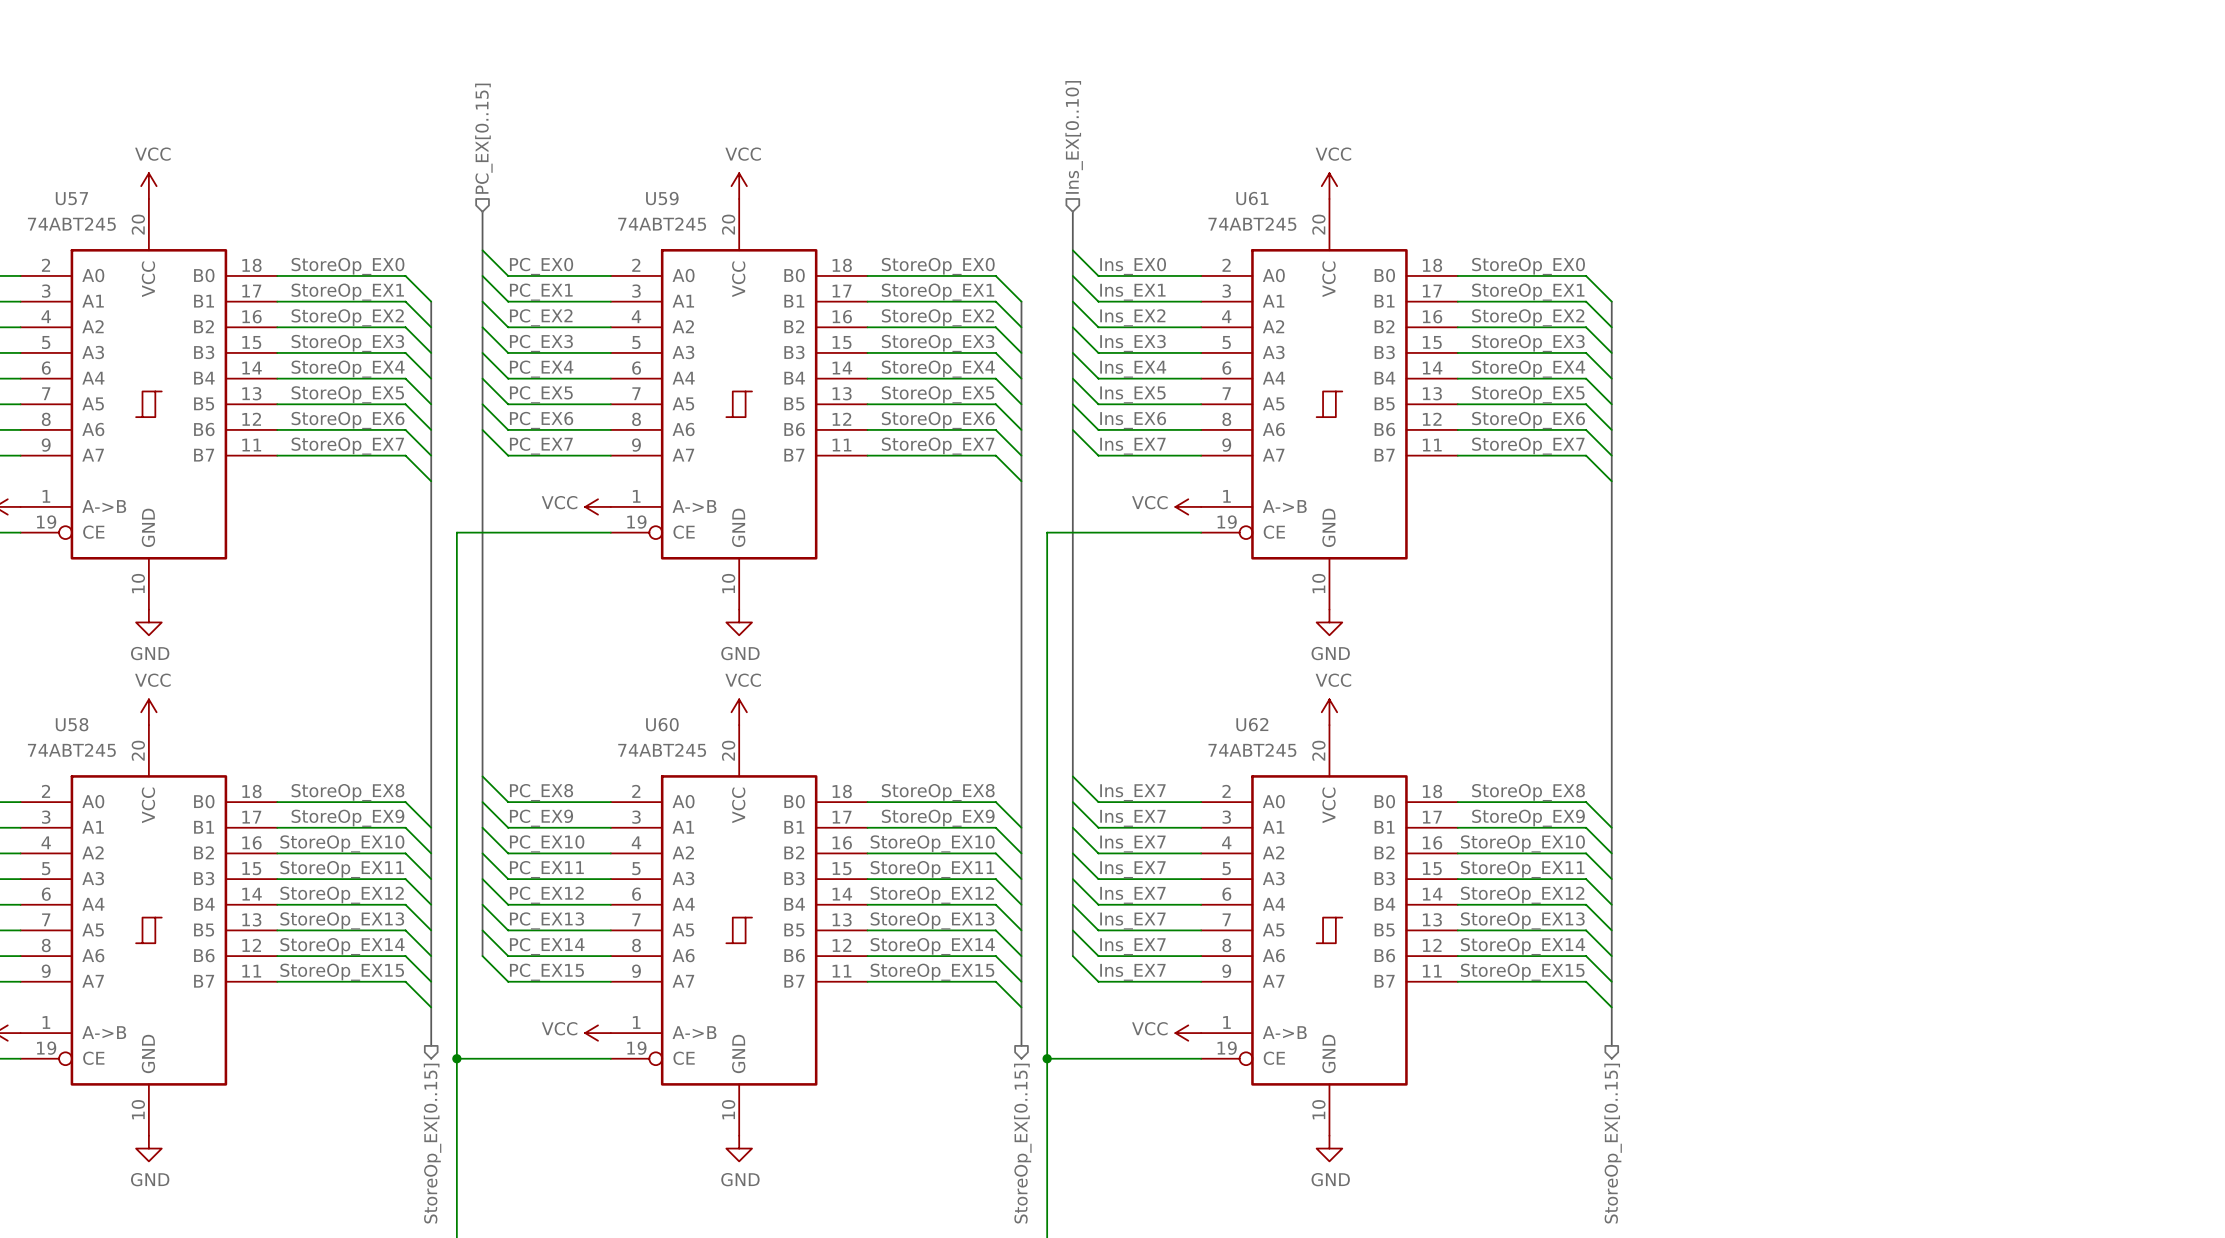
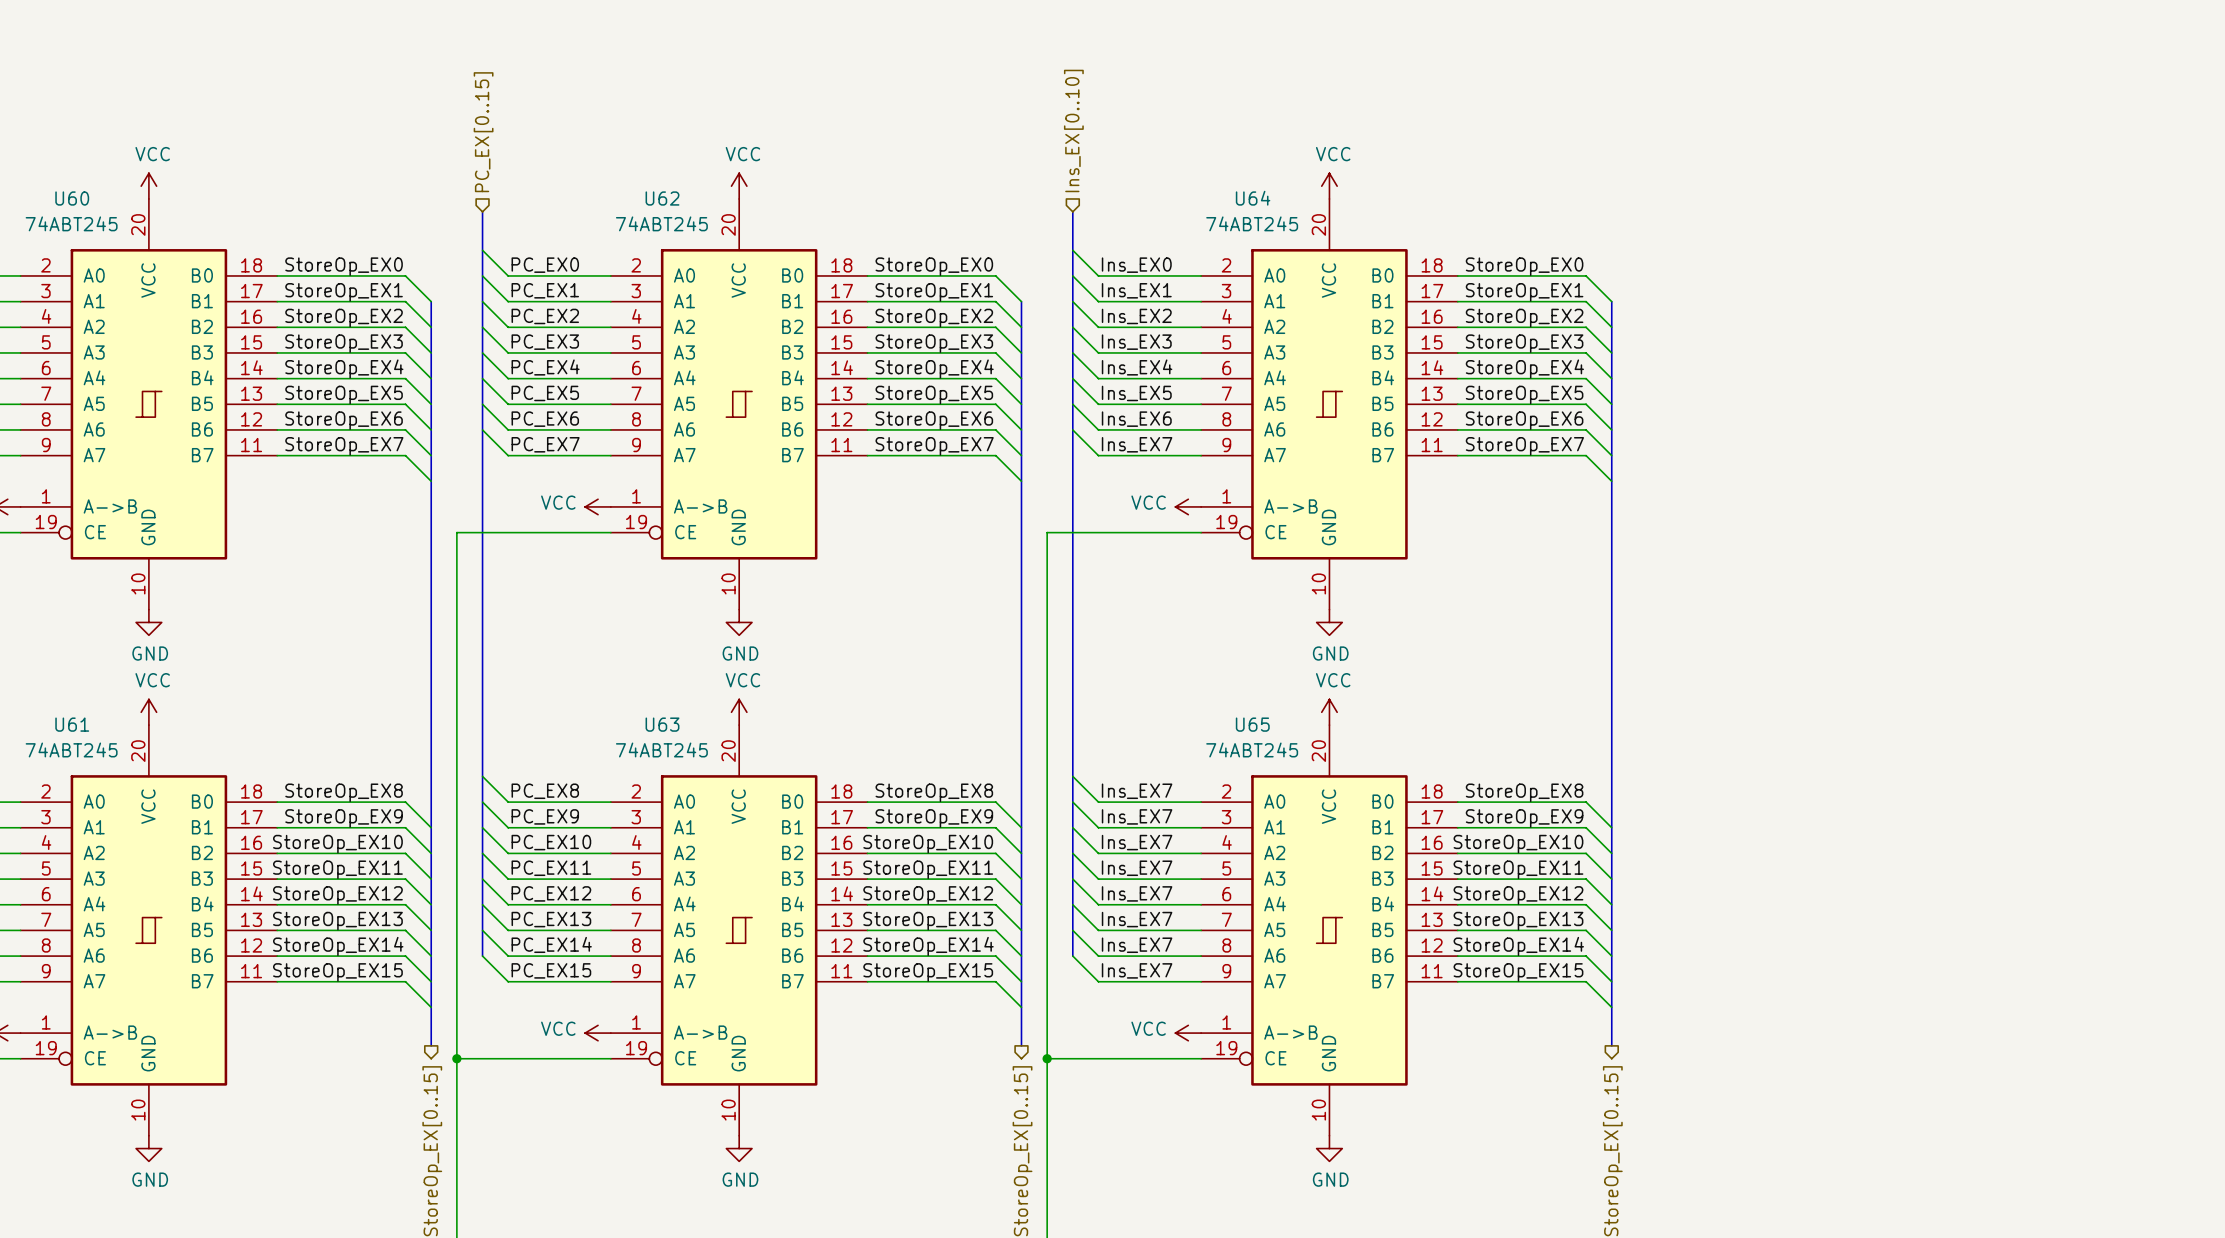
U57 name: U57 (71, 198) -> U60 (72, 198)
U59 name: U59 (662, 198) -> U62 (662, 198)
U61 name: U61 (1252, 198) -> U64 (1253, 198)
U58 name: U58 (72, 724) -> U61 (72, 724)
U60 name: U60 (662, 724) -> U63 (662, 724)
U62 name: U62 (1252, 724) -> U65 (1252, 724)

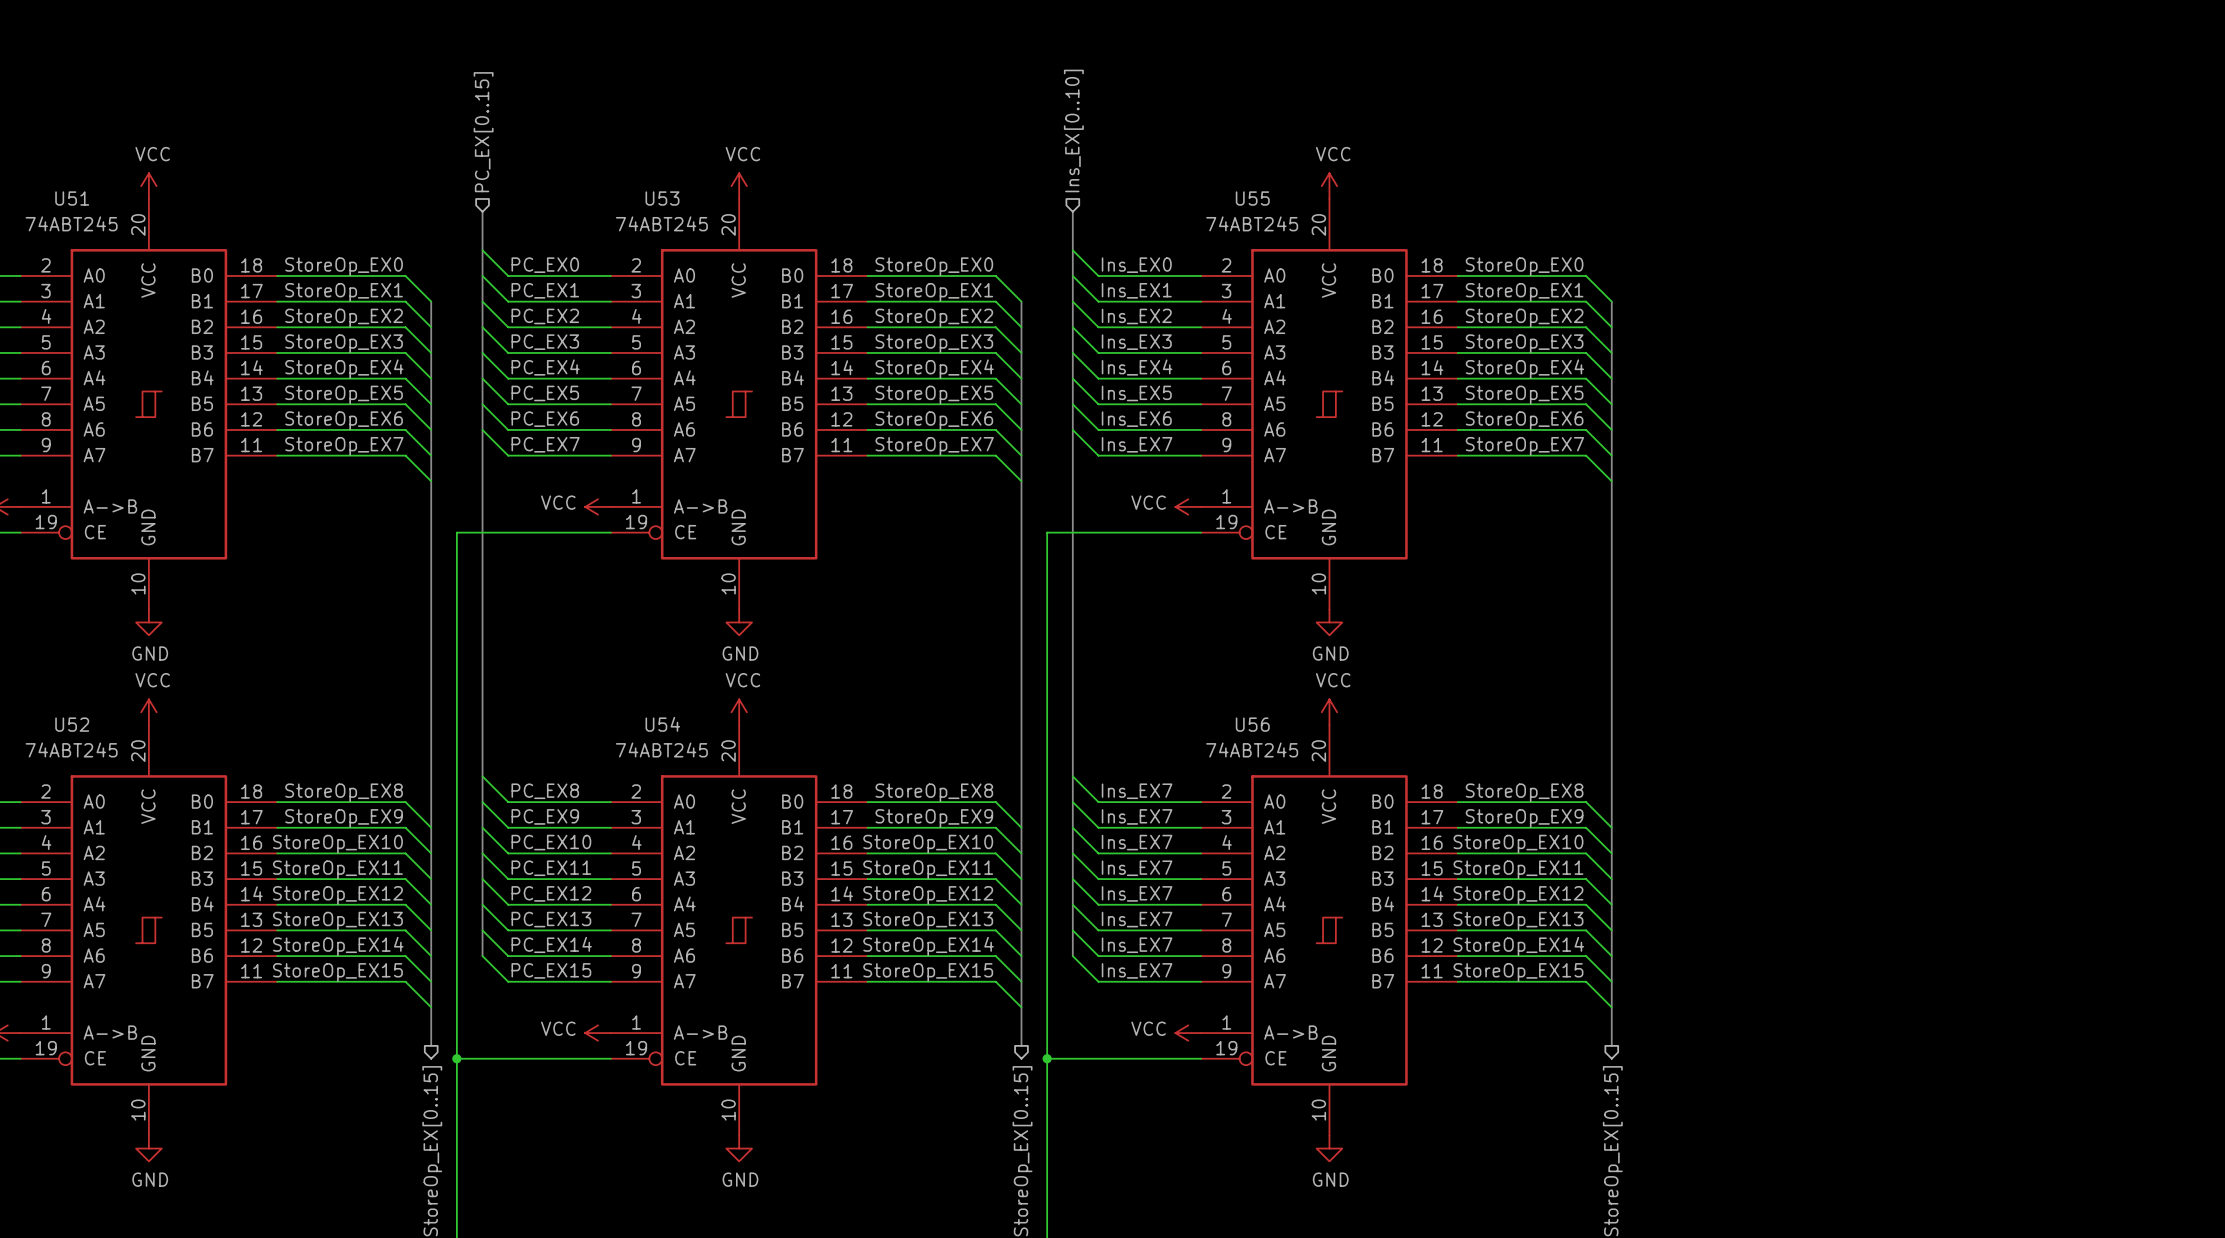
U60 name: U60 (72, 198) -> U51 (72, 198)
U62 name: U62 (662, 198) -> U53 (662, 198)
U64 name: U64 (1253, 198) -> U55 (1252, 198)
U61 name: U61 (72, 724) -> U52 (72, 724)
U63 name: U63 (662, 724) -> U54 (662, 724)
U65 name: U65 (1252, 724) -> U56 (1252, 724)

